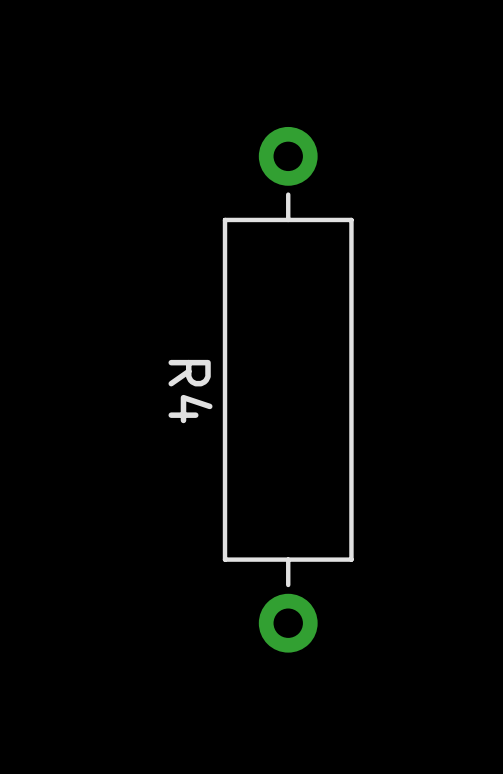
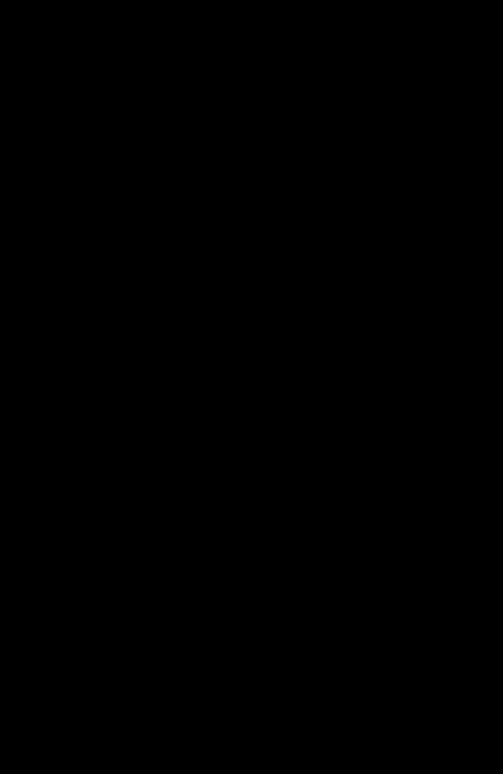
R4: (288, 389) -> none

